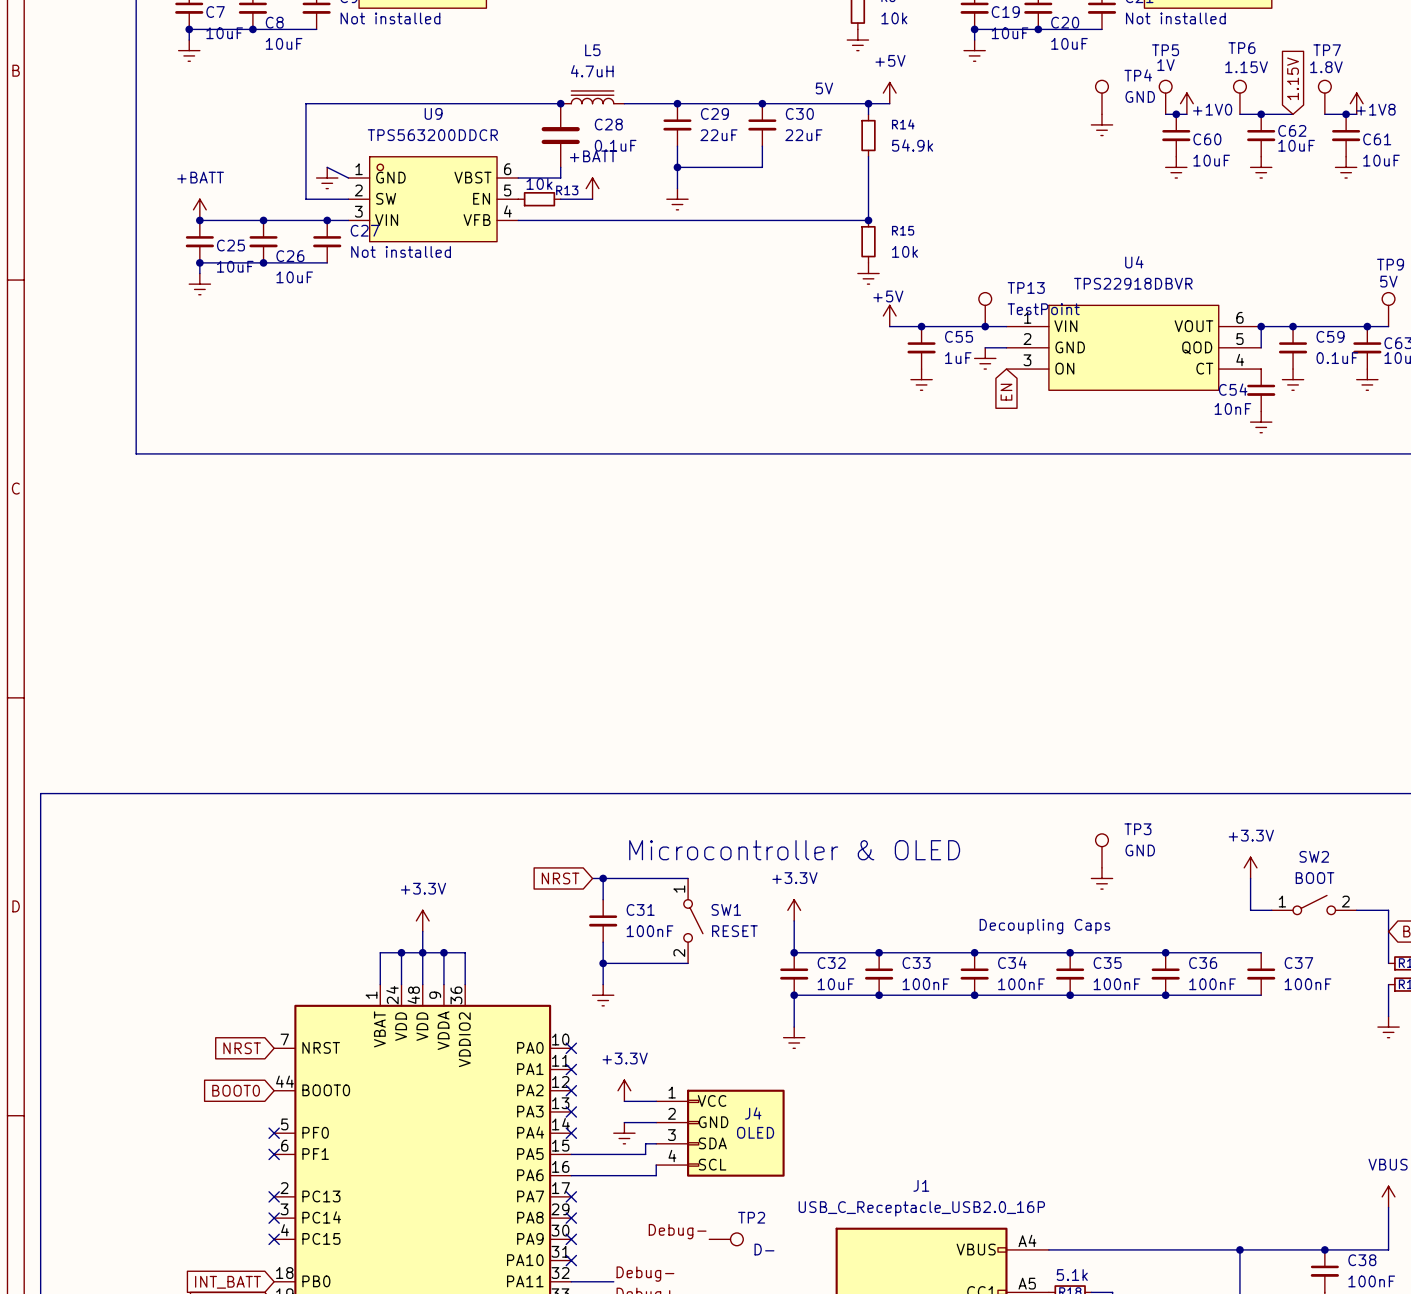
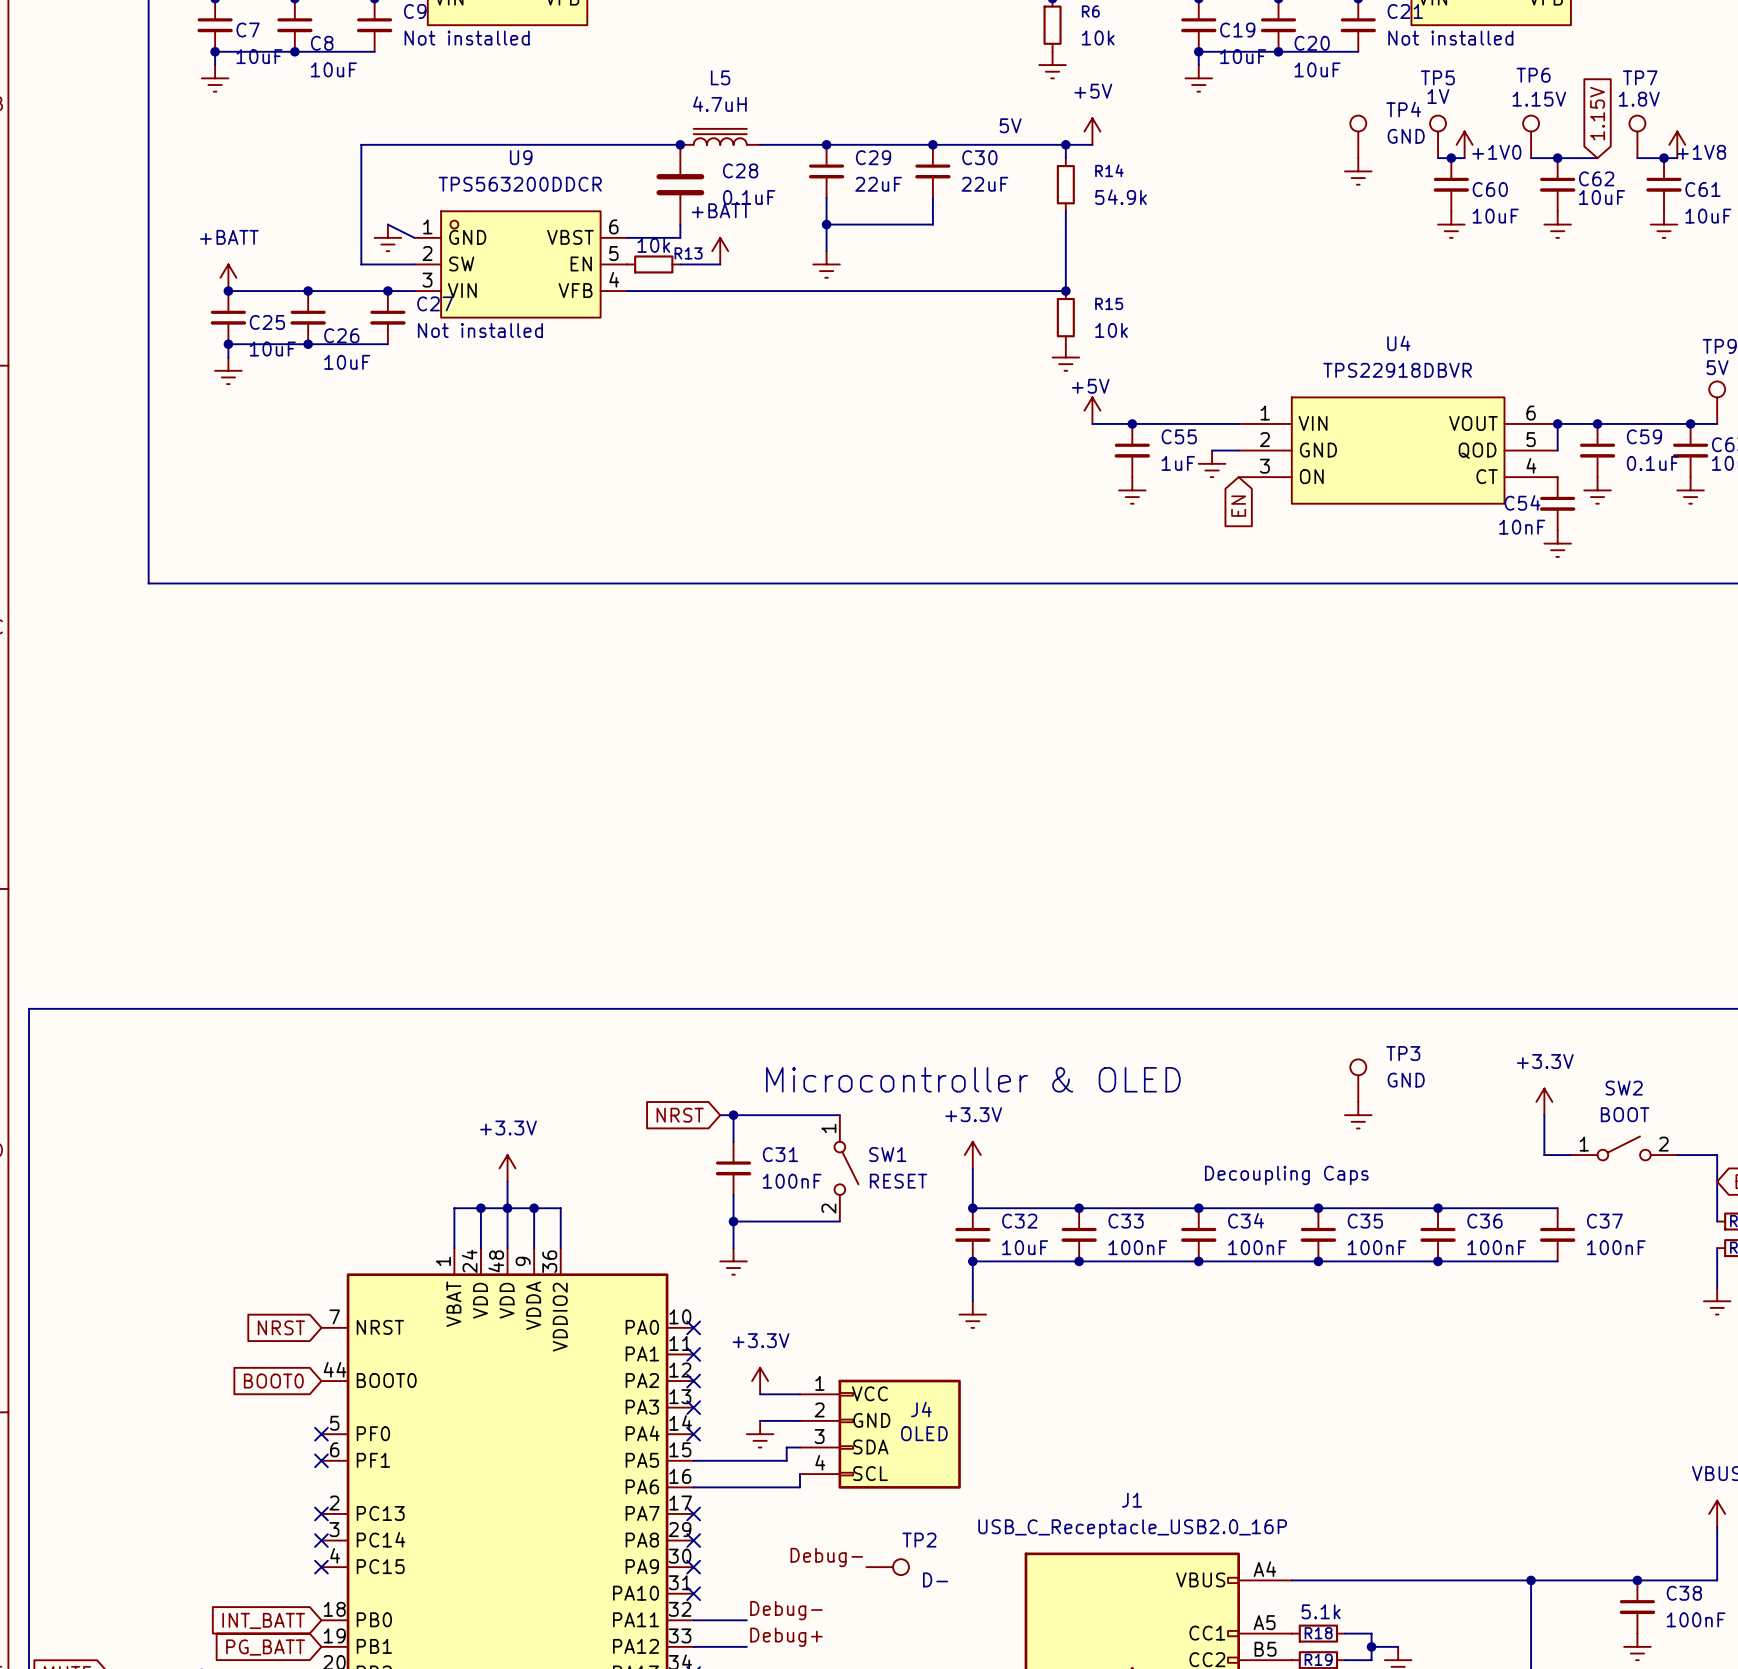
TP13: TestPoint (985, 309) -> none
junction: (985, 326) -> none

